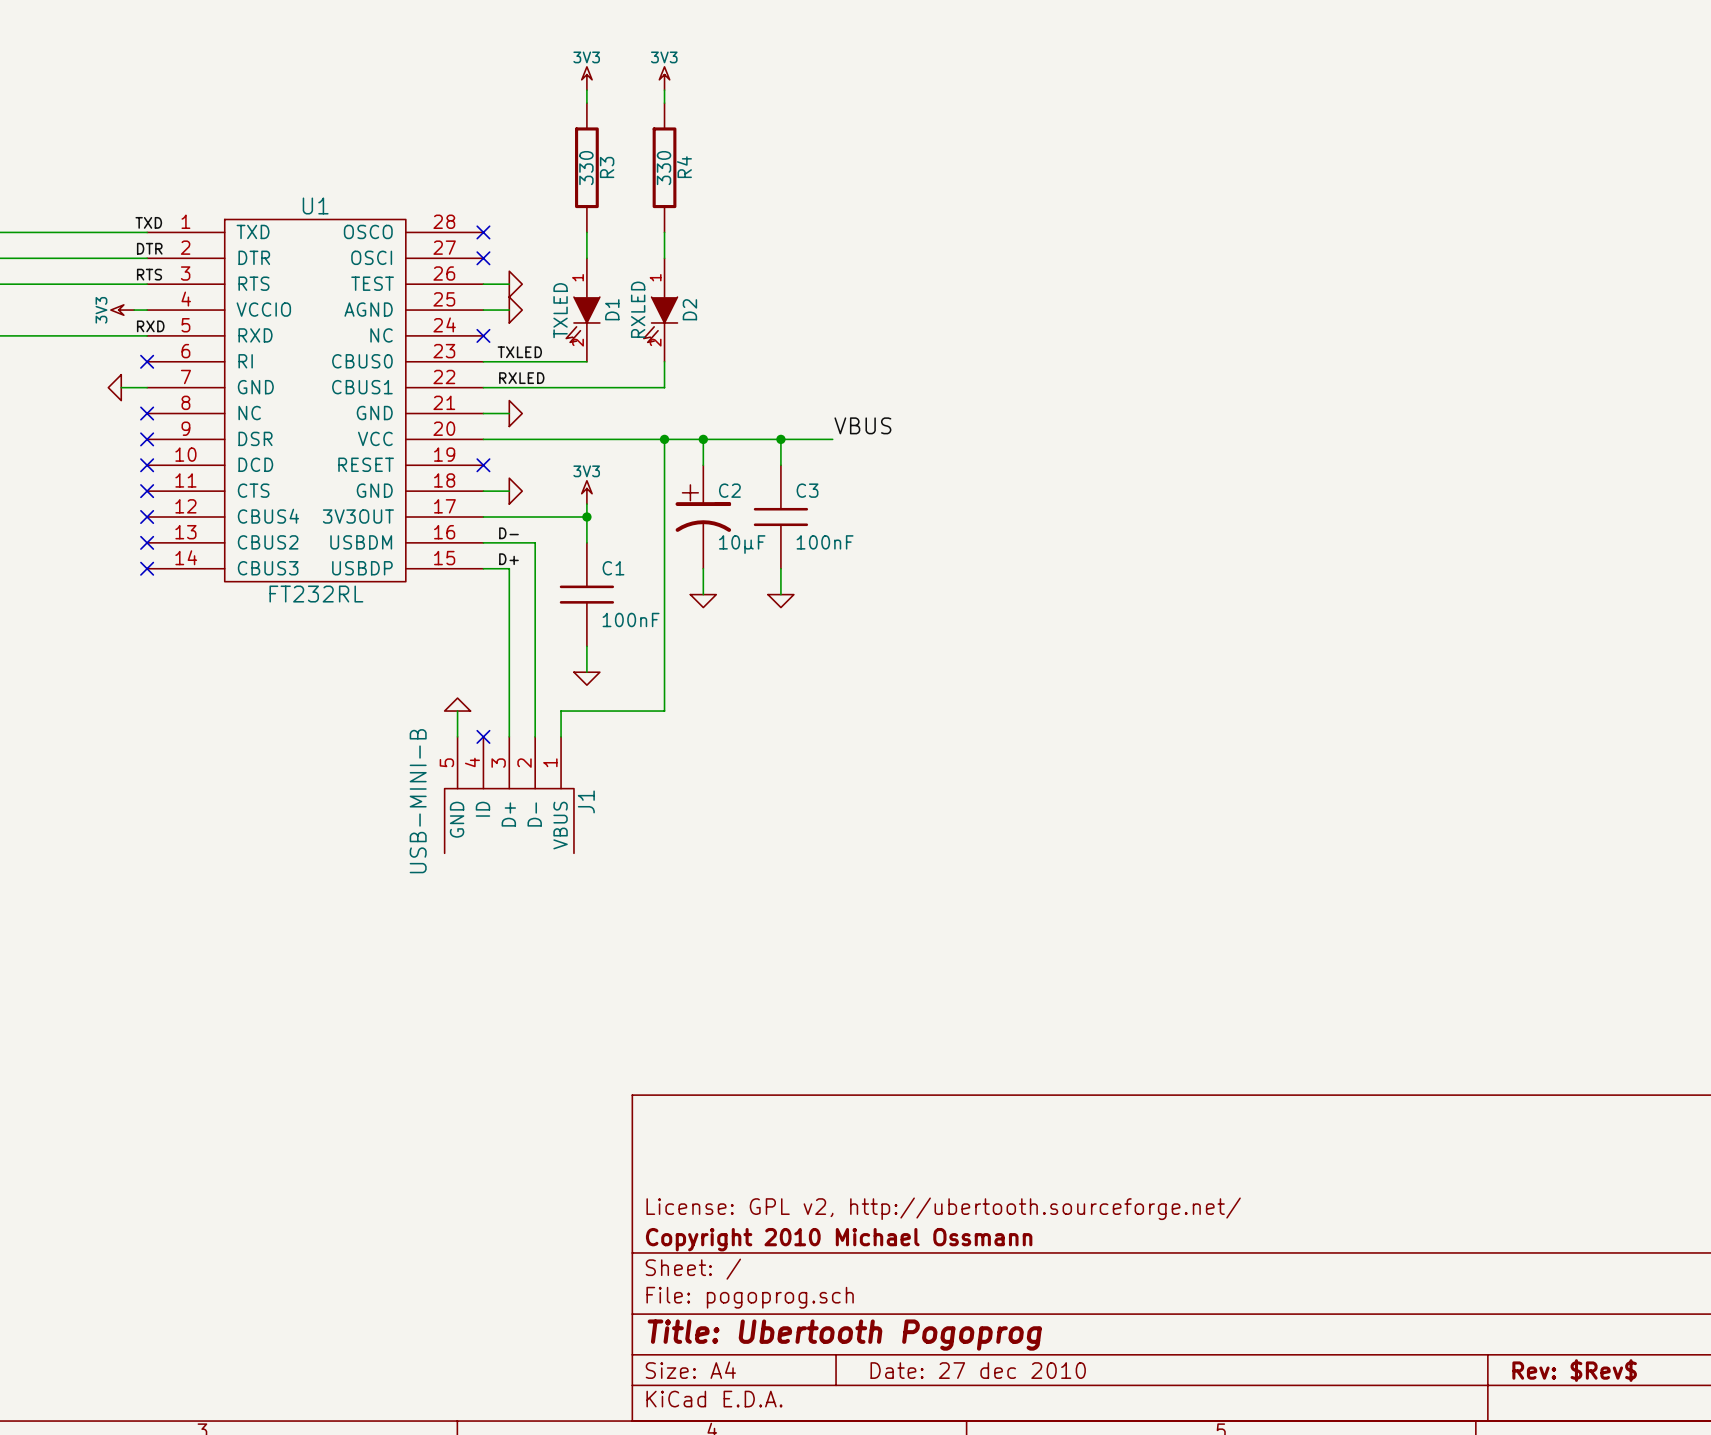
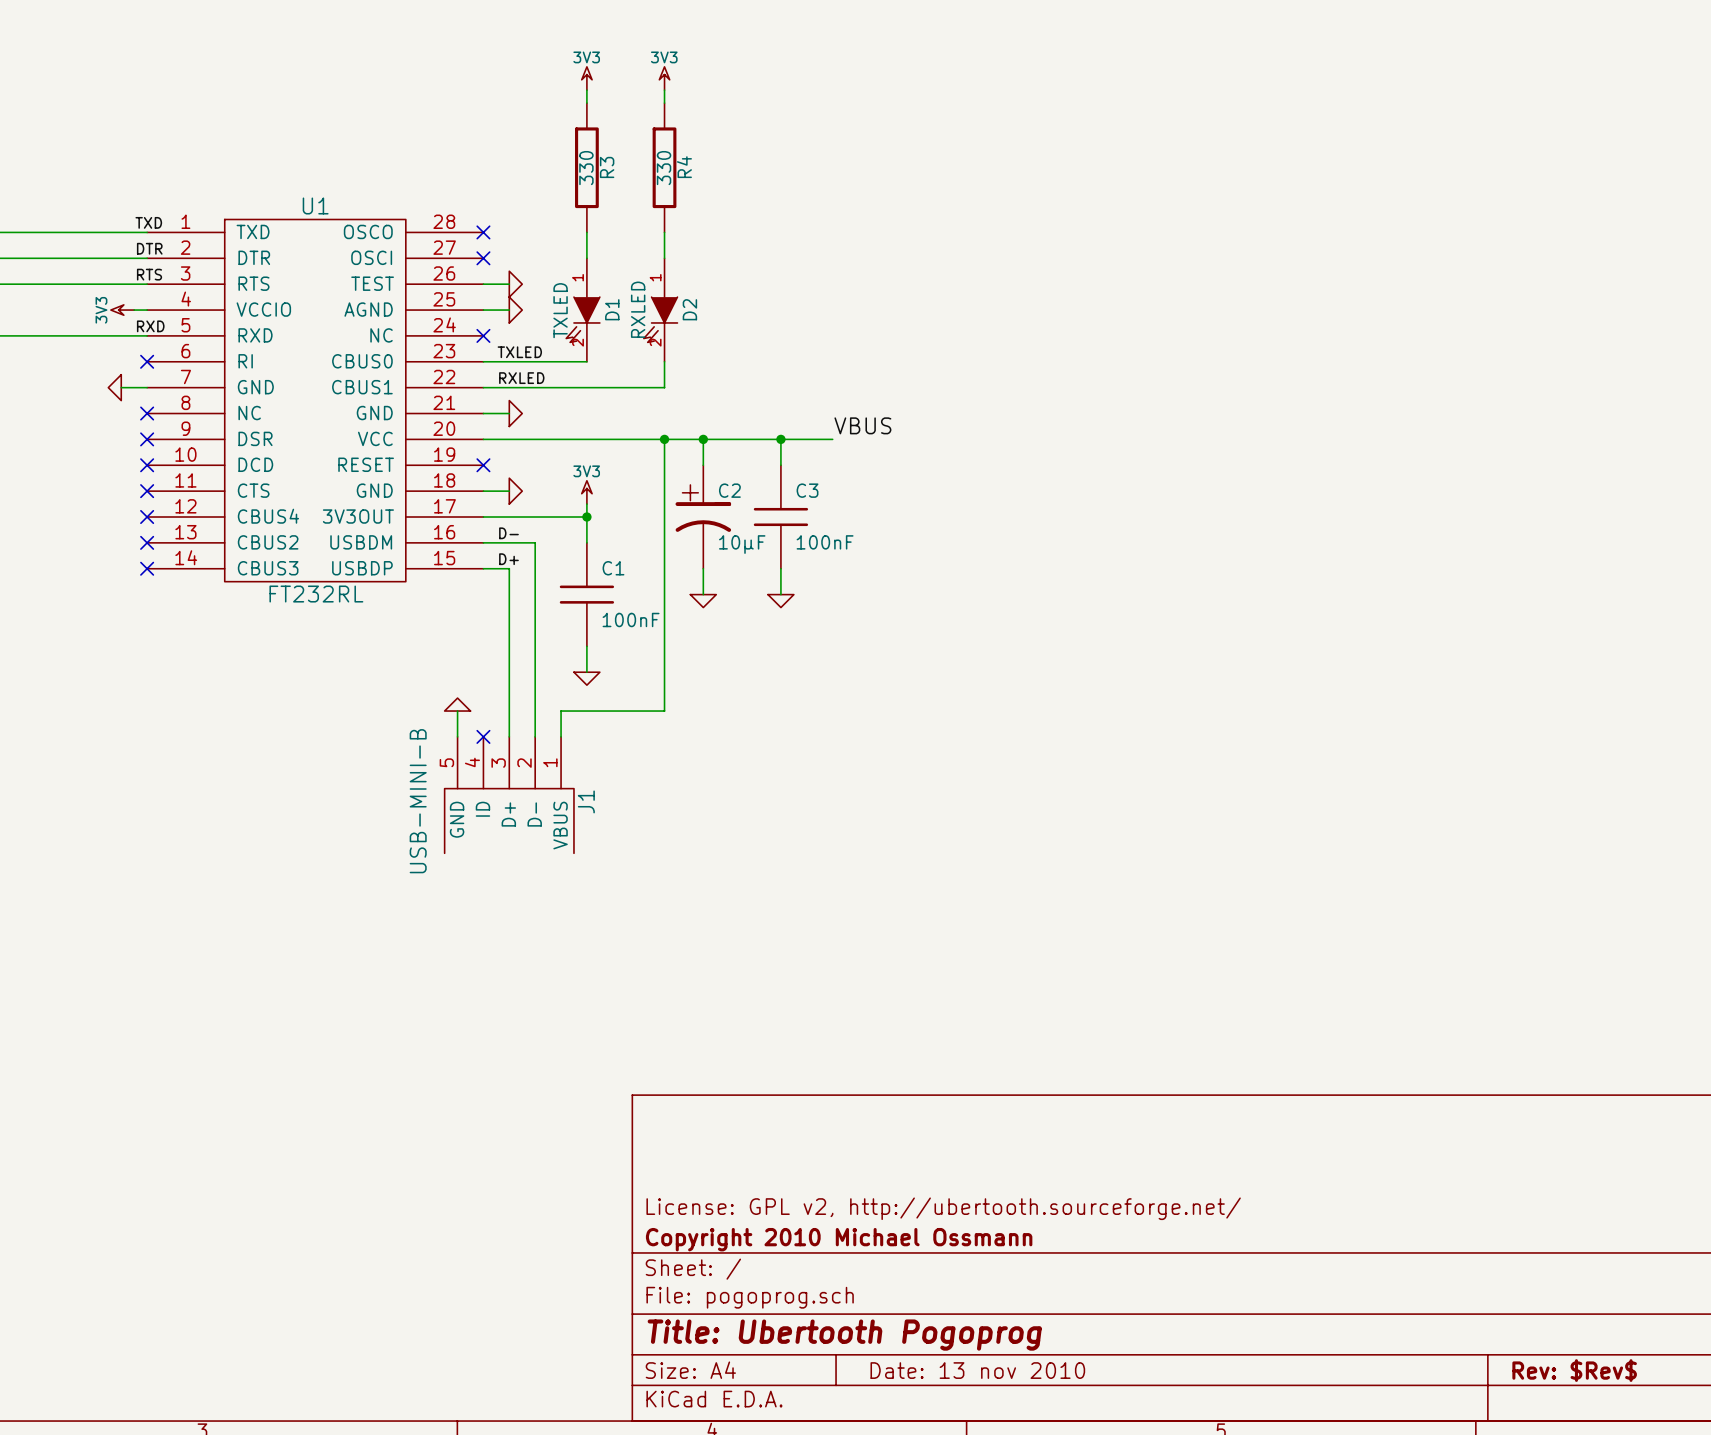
title block: Date: 27 dec 2010 (978, 1370) -> Date: 13 nov 2010 (977, 1370)

